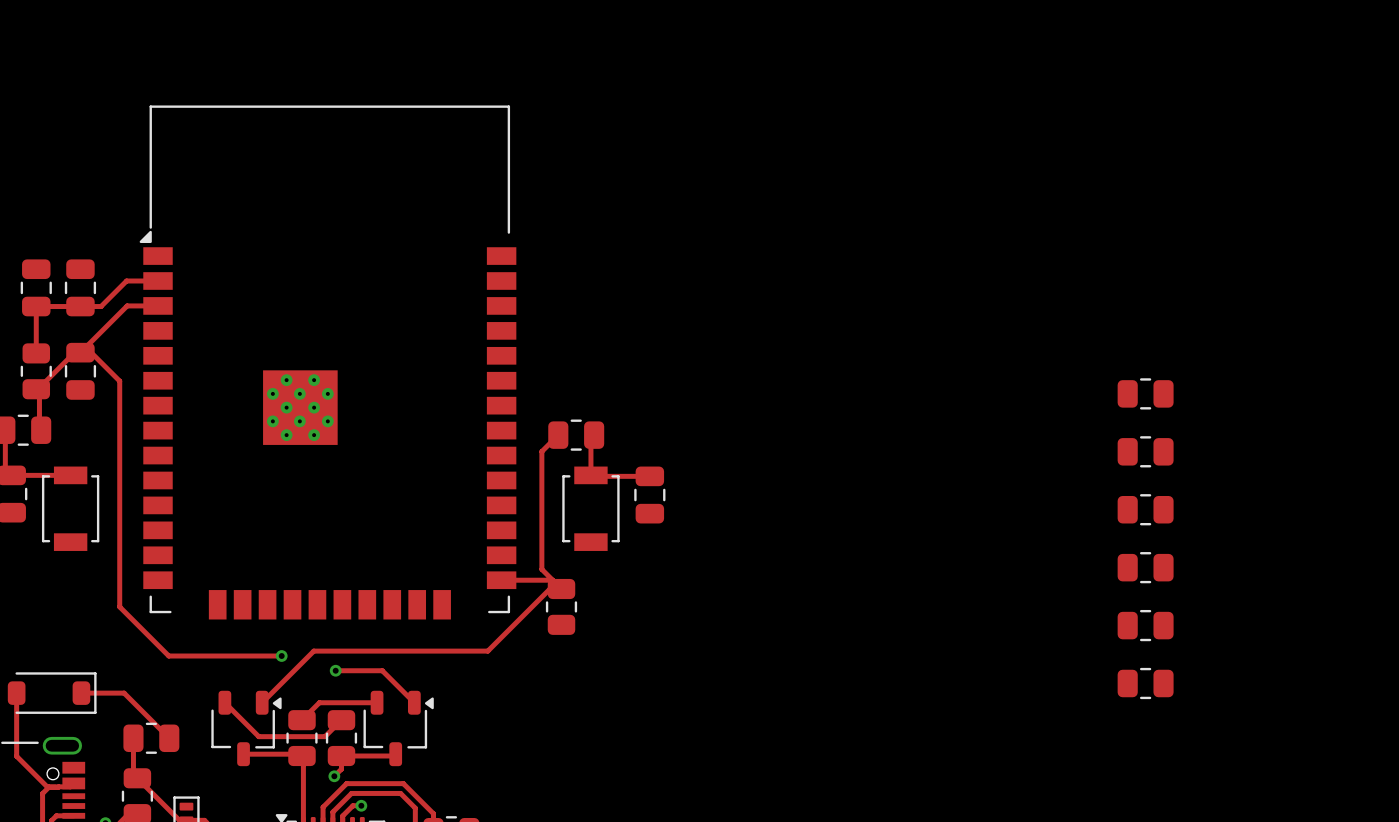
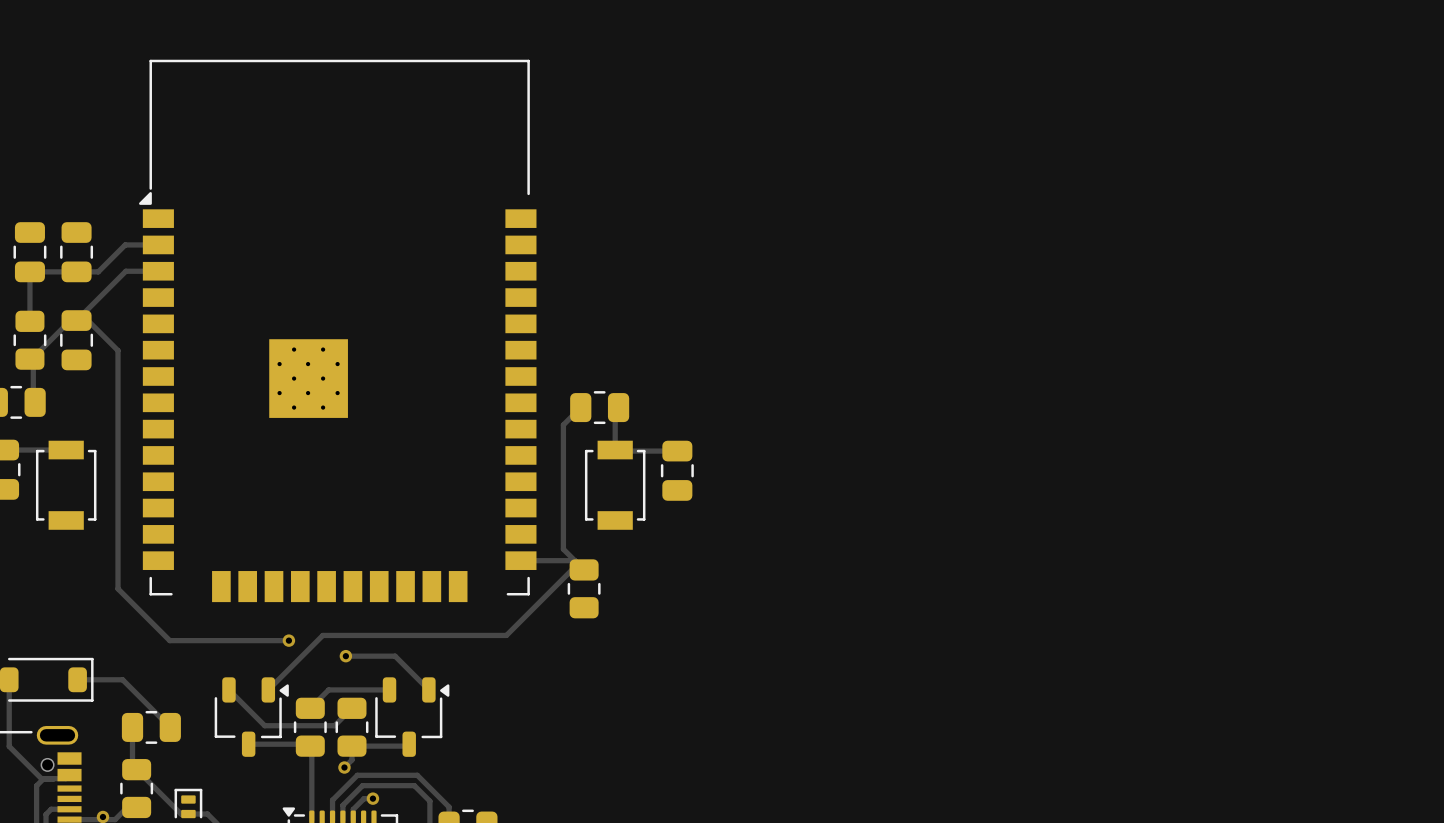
part: (1145, 393) -> none
part: (1145, 451) -> none
part: (1145, 509) -> none
part: (1145, 567) -> none
part: (1145, 625) -> none
part: (1145, 683) -> none

